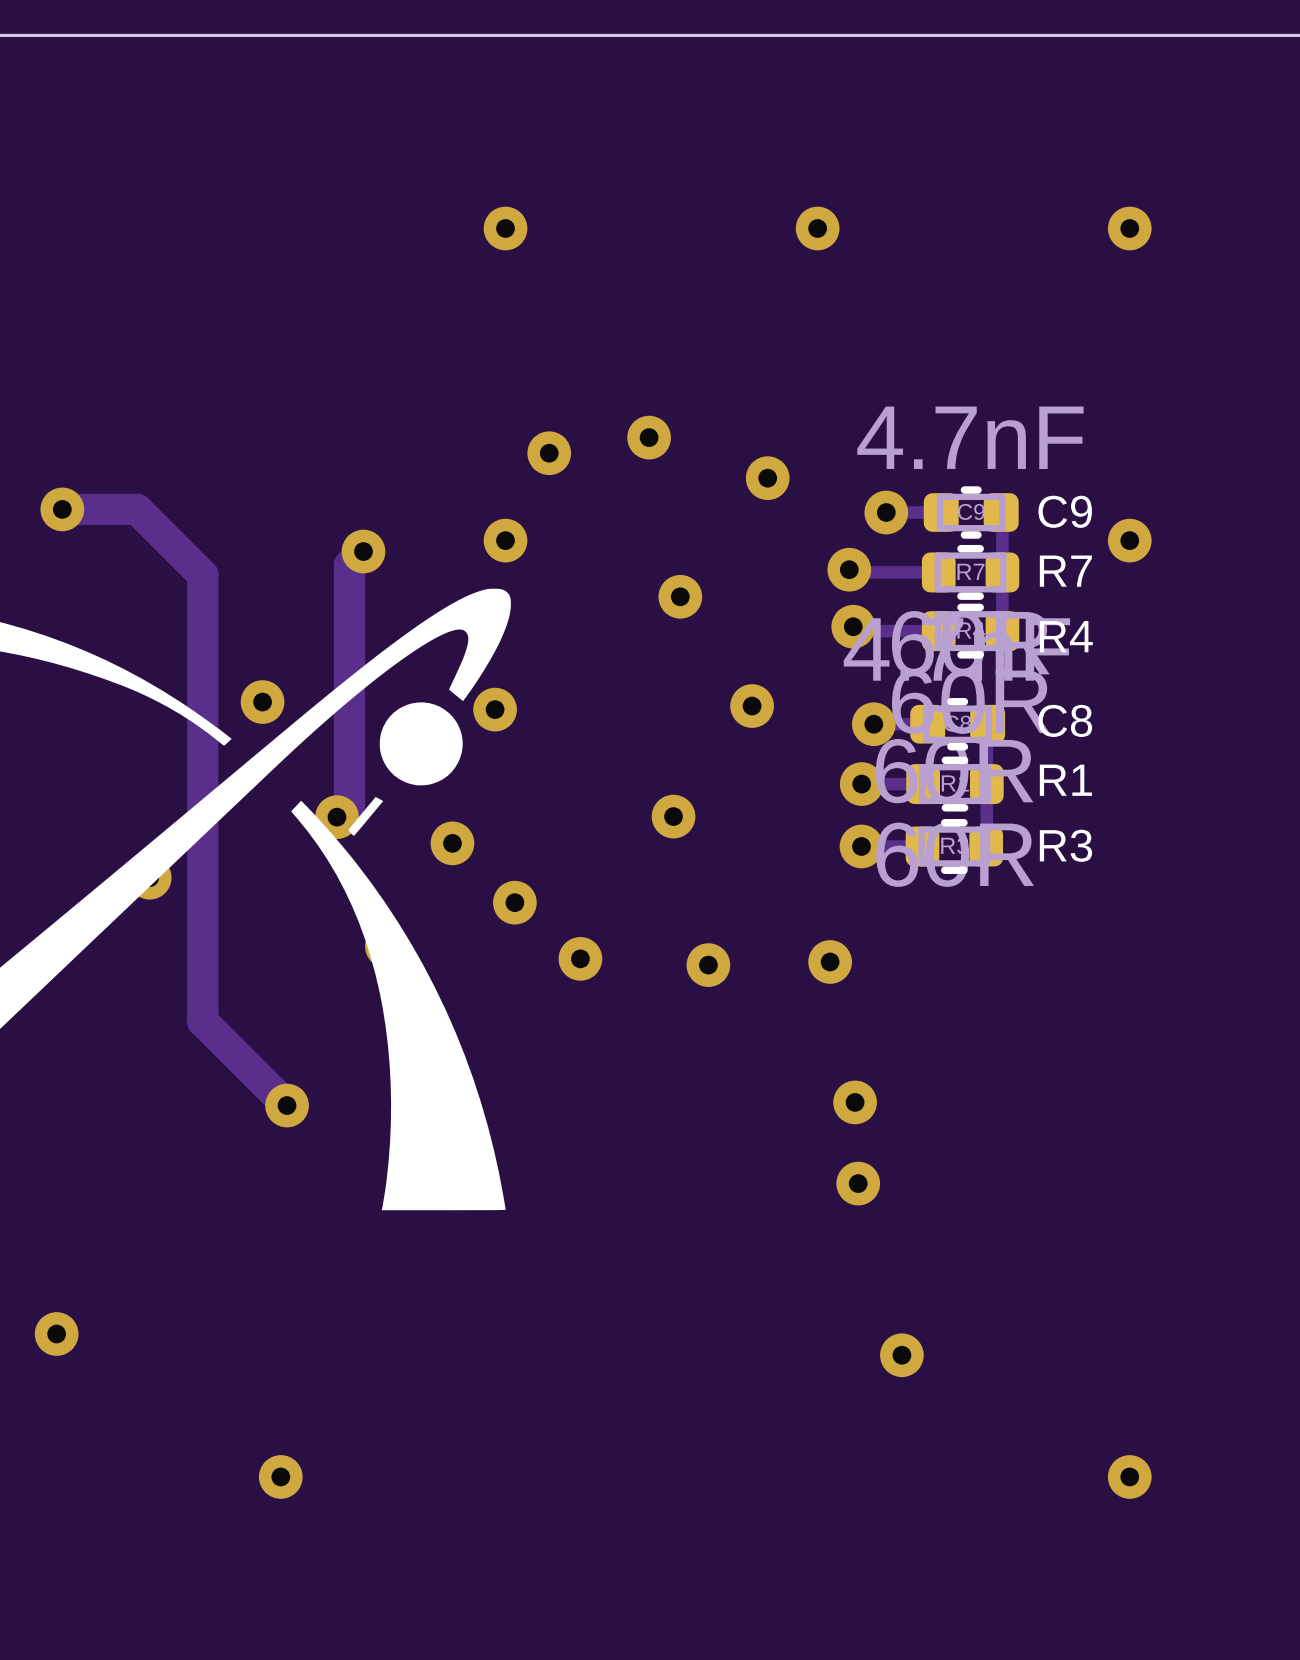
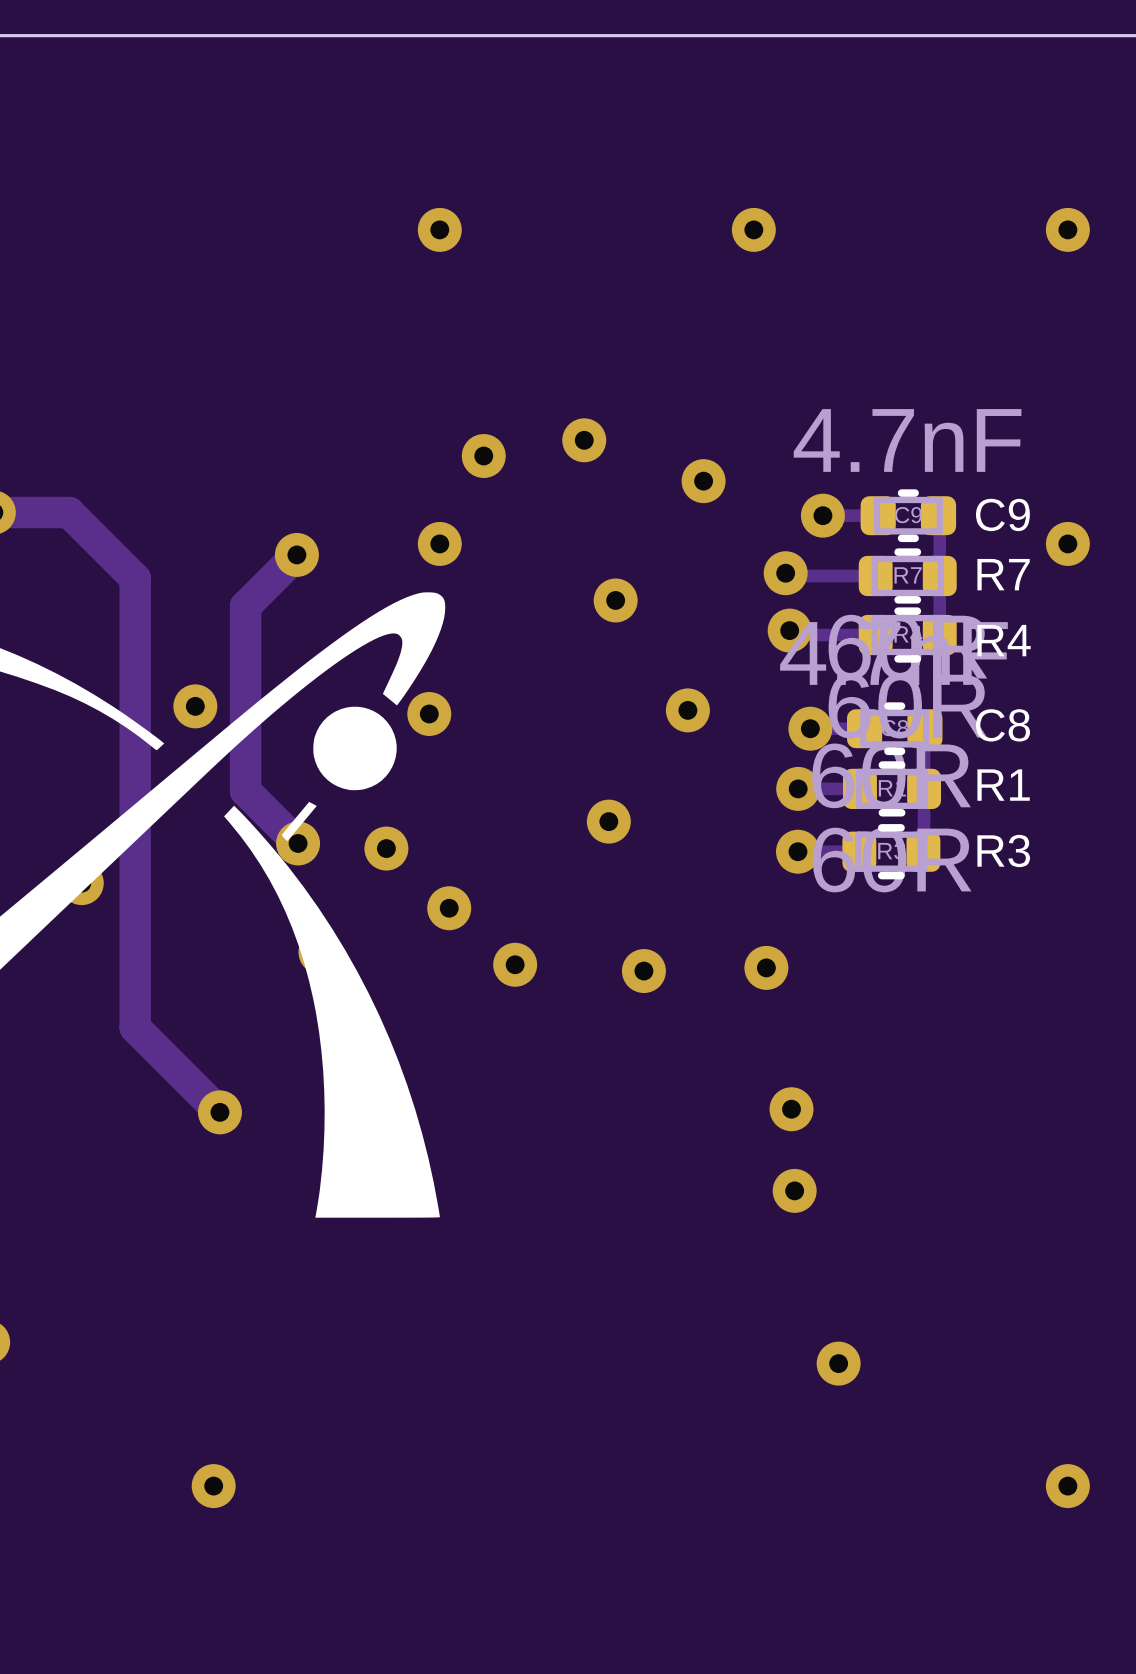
track: (349, 565) (349, 804) (336, 817) -> (282, 569) (245, 606) (245, 790) (298, 843)
via position: (336, 817) -> (298, 843)

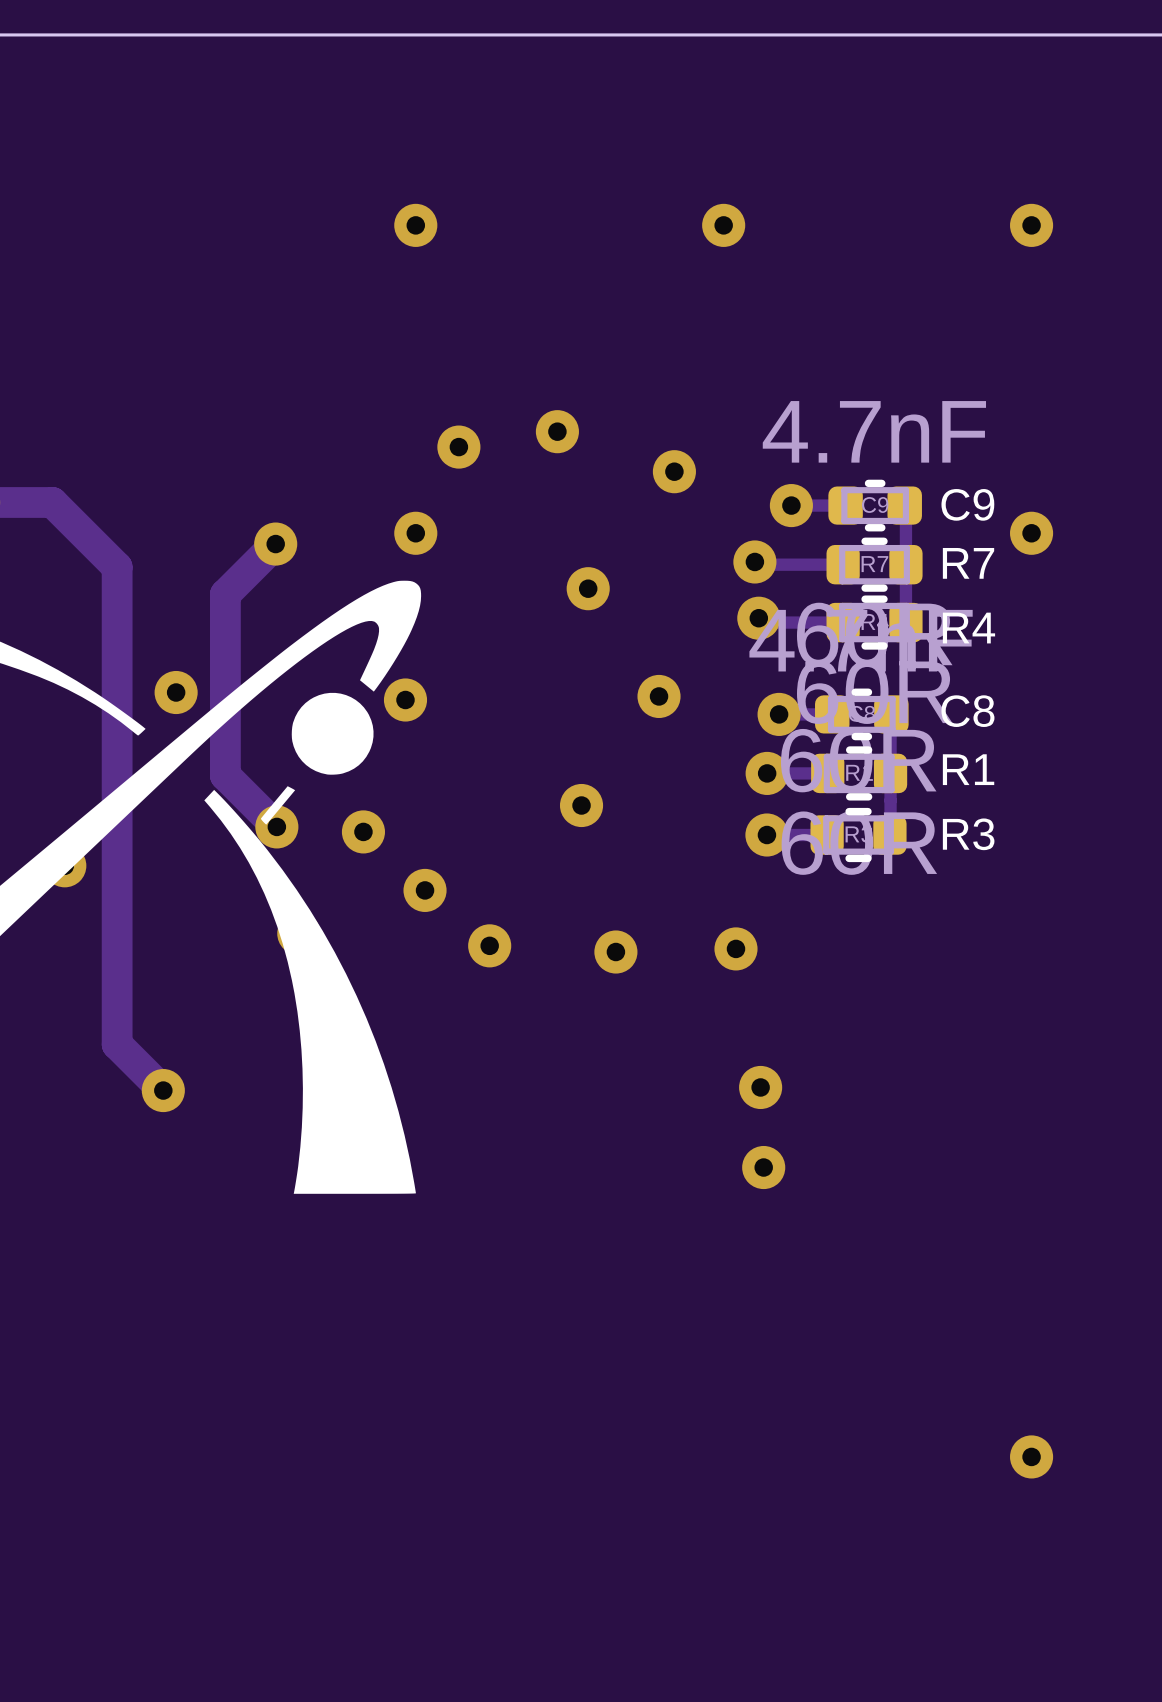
track: (135, 1027) (219, 1112) -> (117, 1007) (117, 1044) (163, 1090)
via position: (219, 1112) -> (163, 1090)
via: (838, 1363) -> none
via: (213, 1486) -> none

